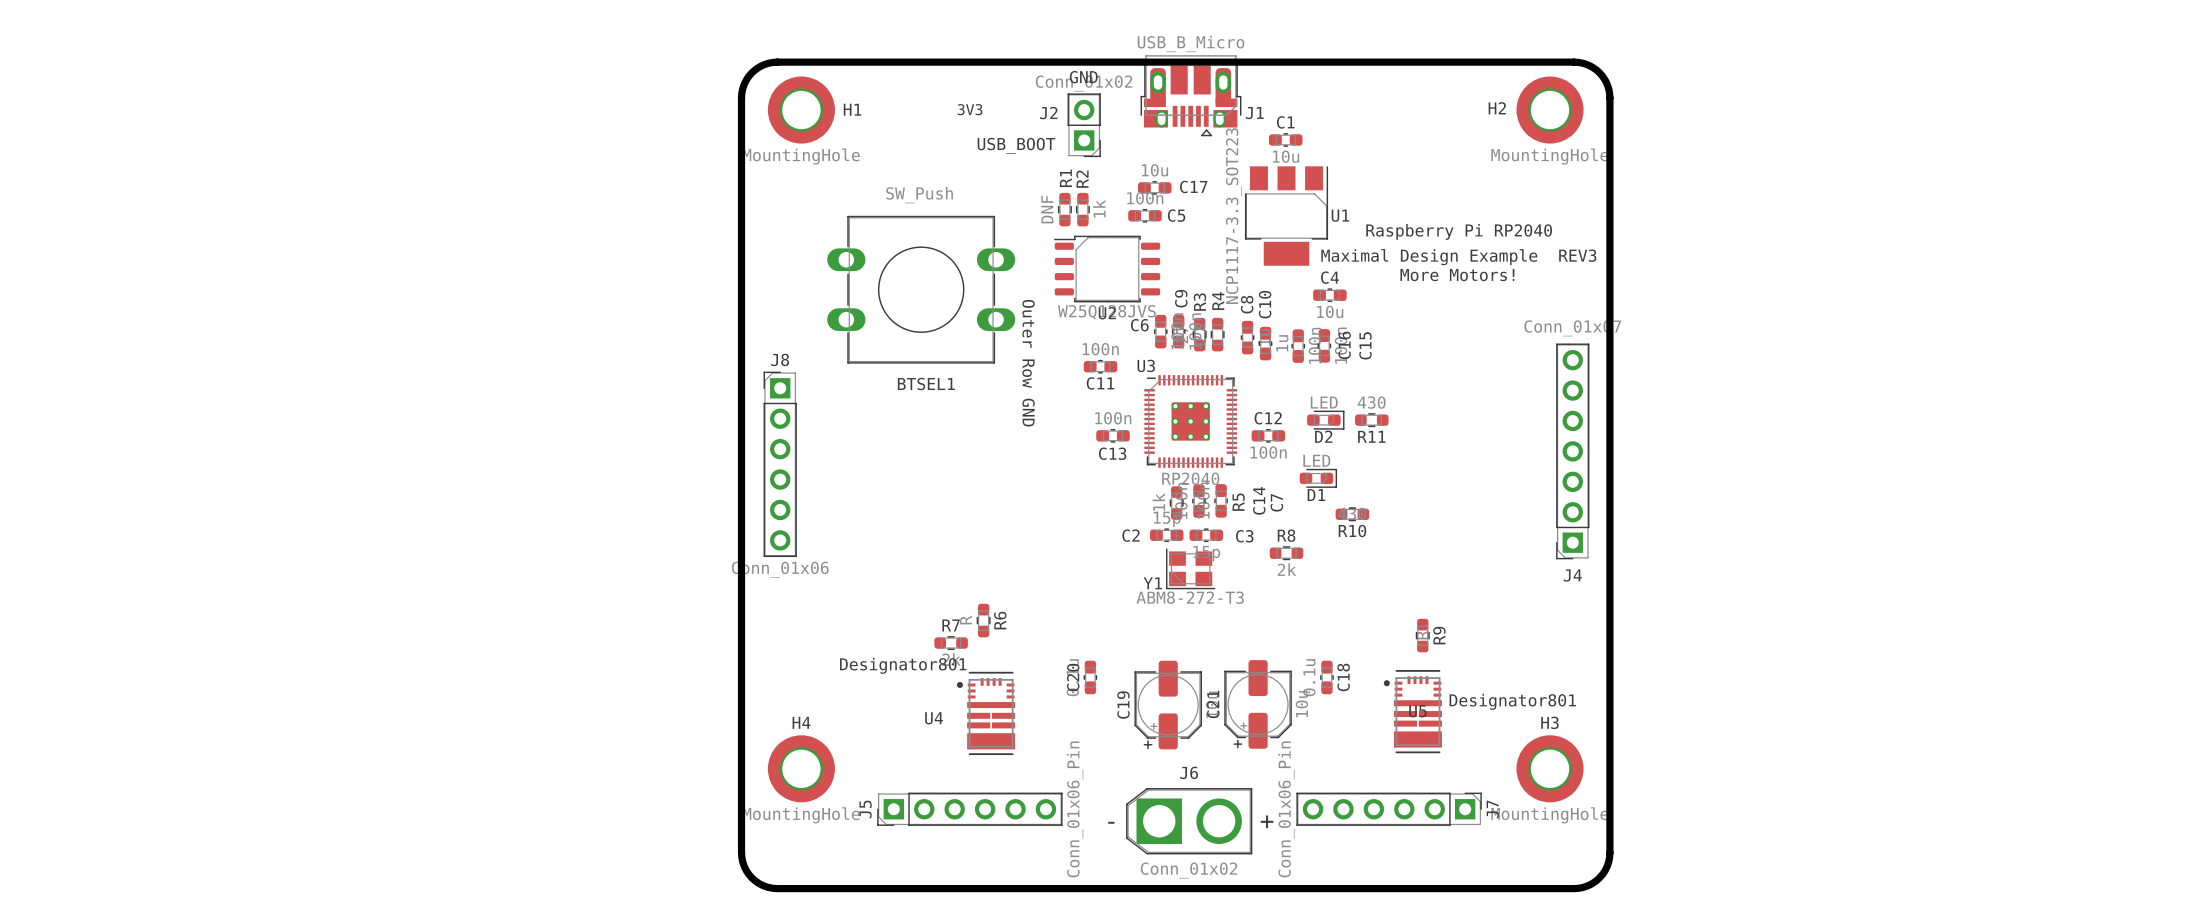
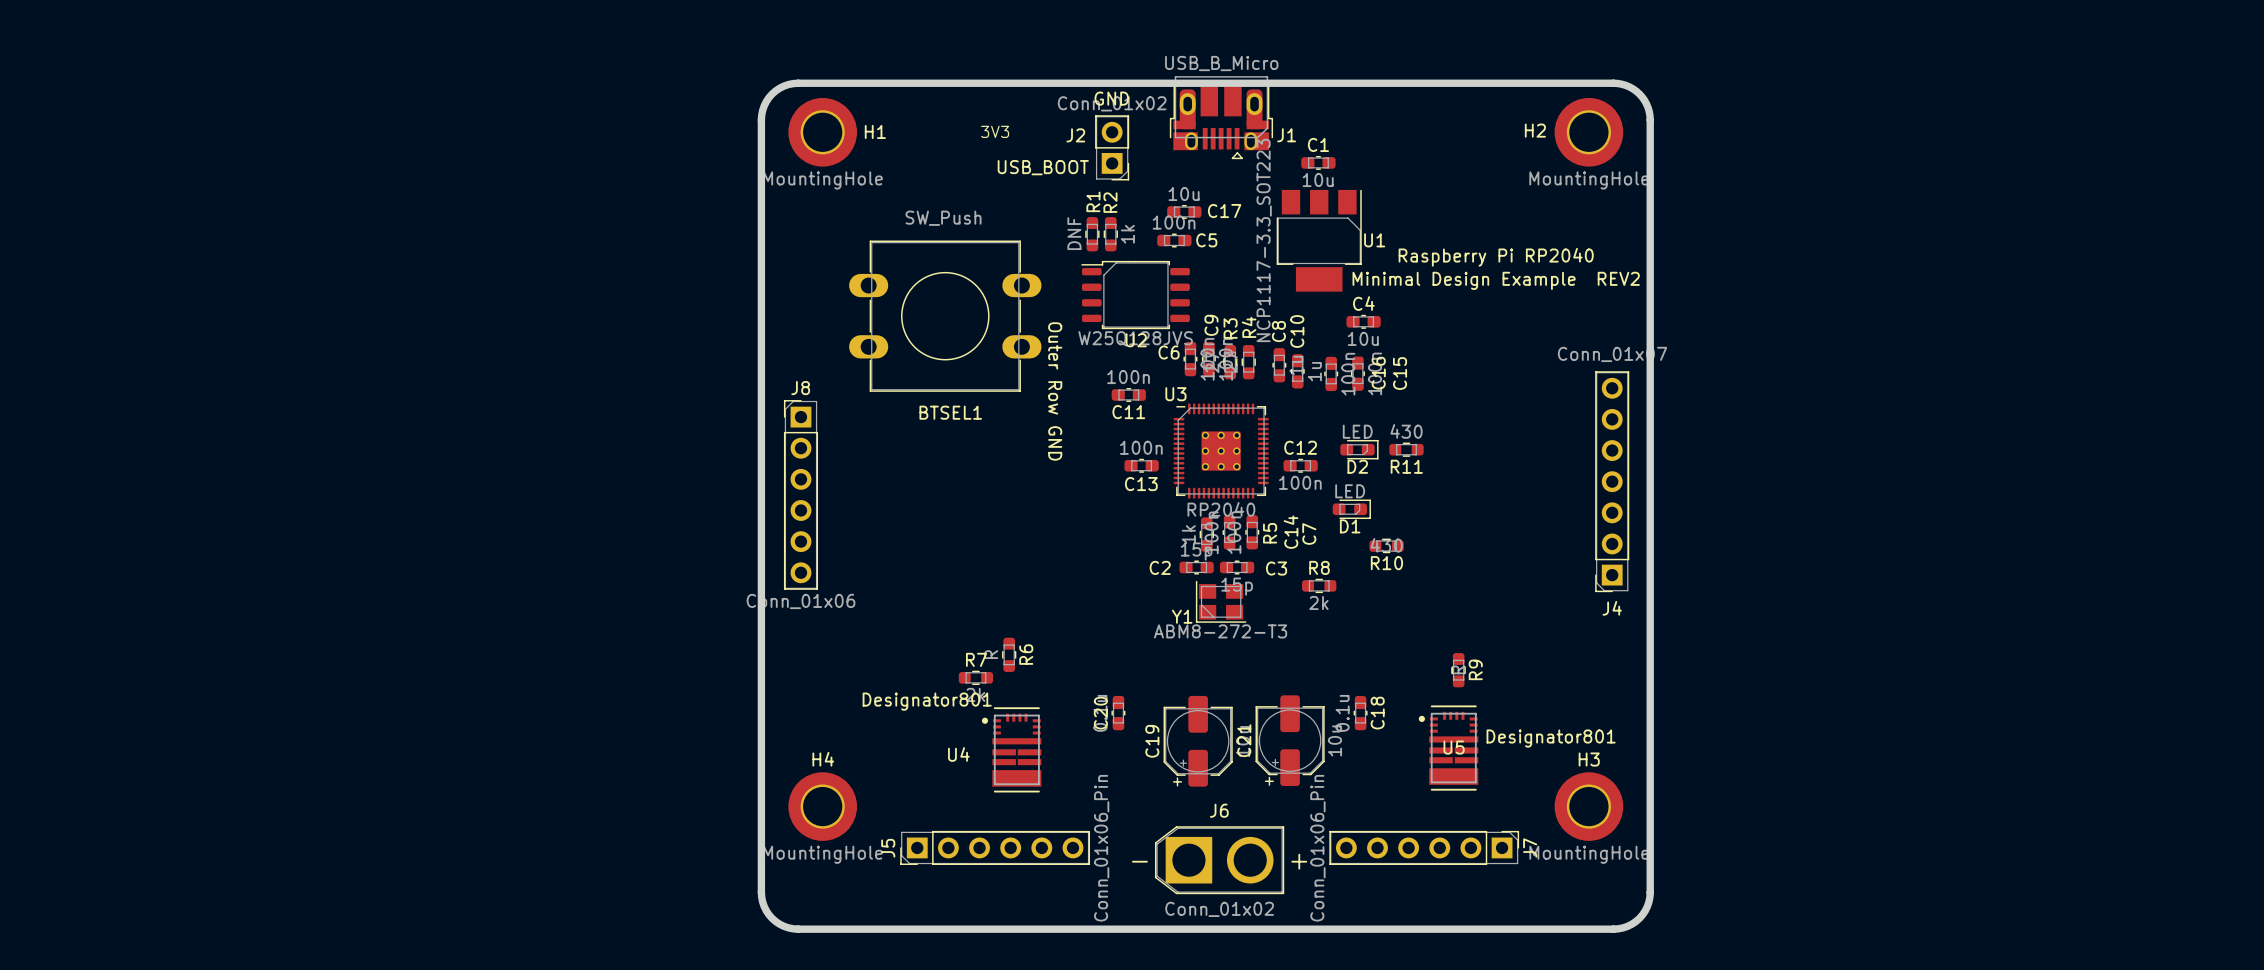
text: Maximal Design Example REV3 (1458, 257) -> Minimal Design Example REV2 (1496, 280)
text: More Motors! (1457, 275) -> none

